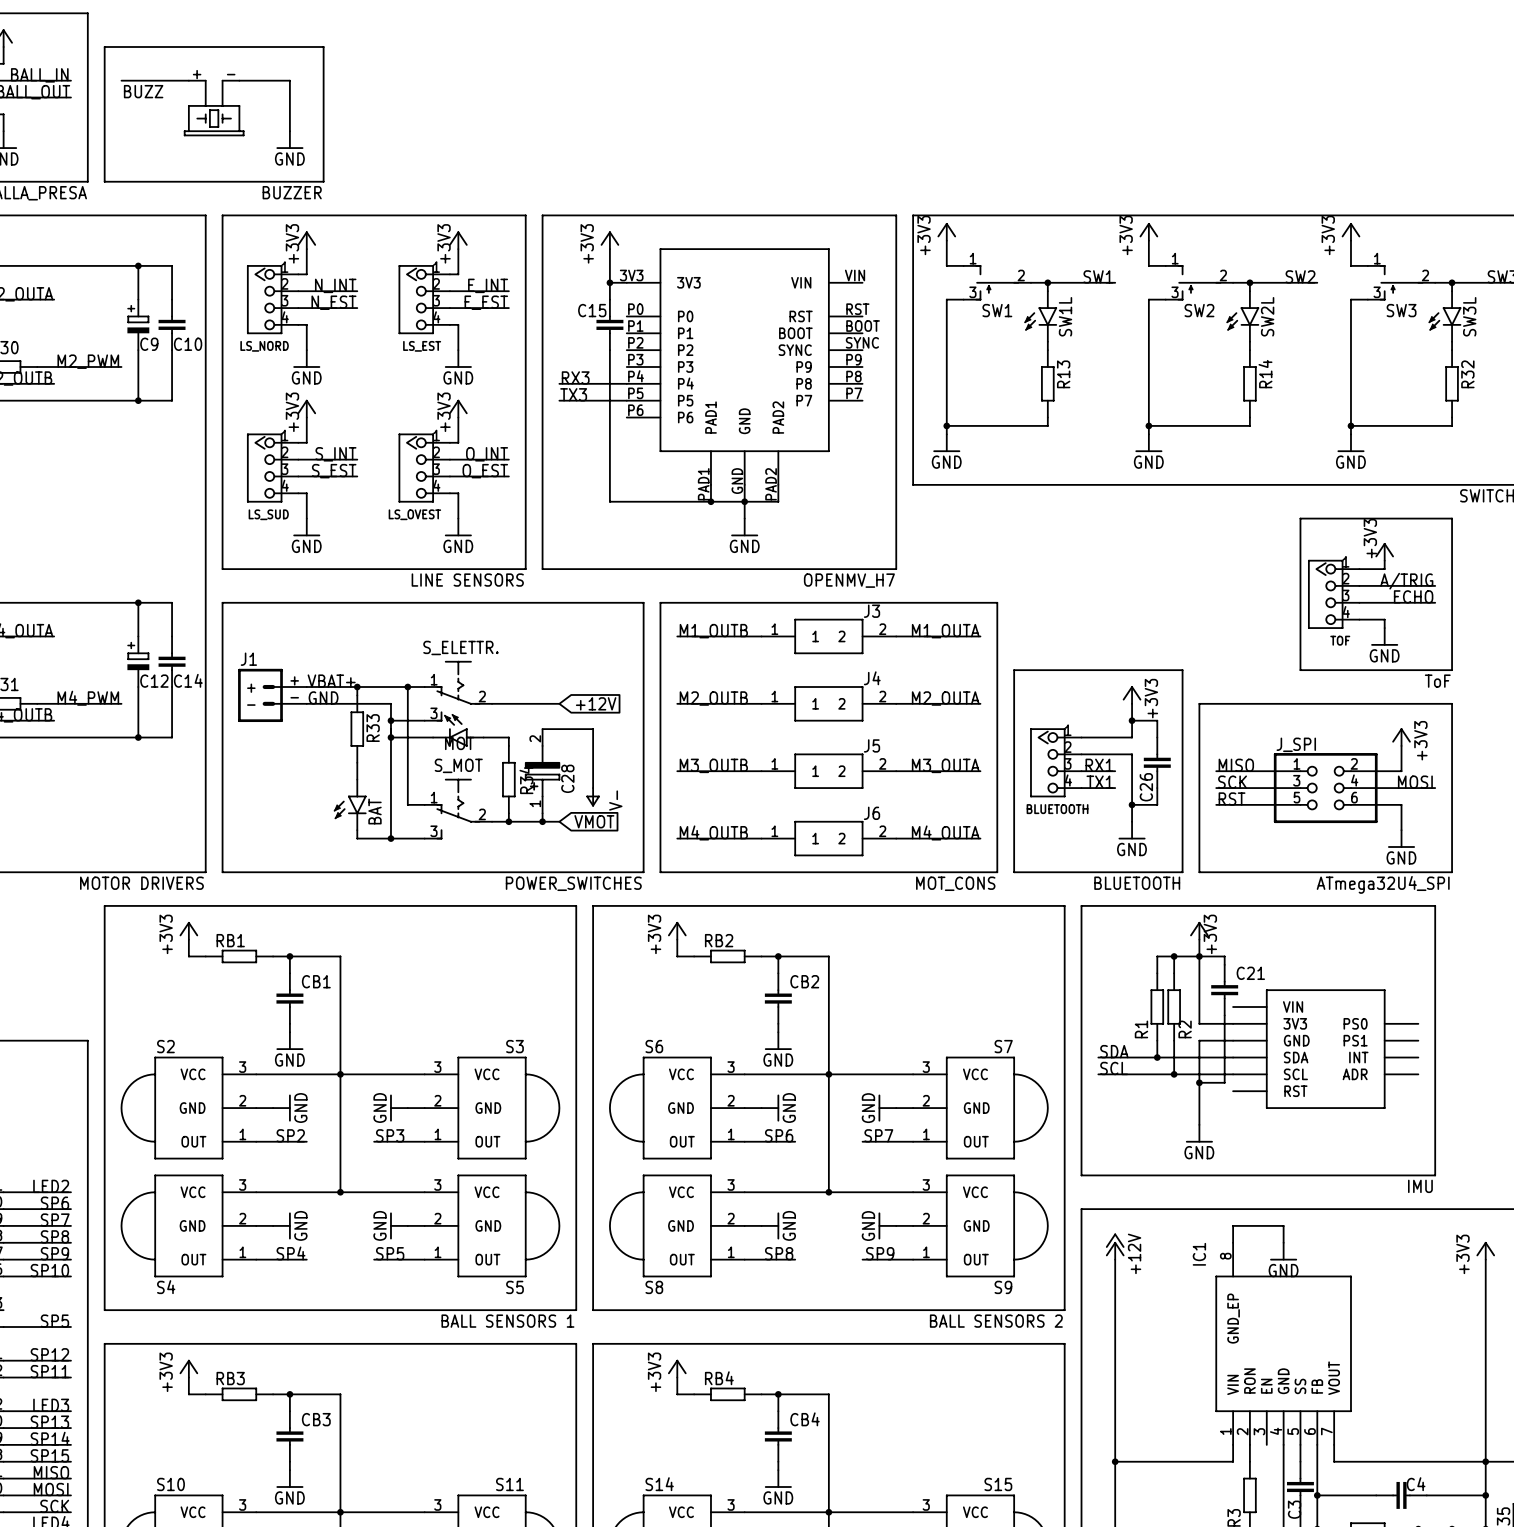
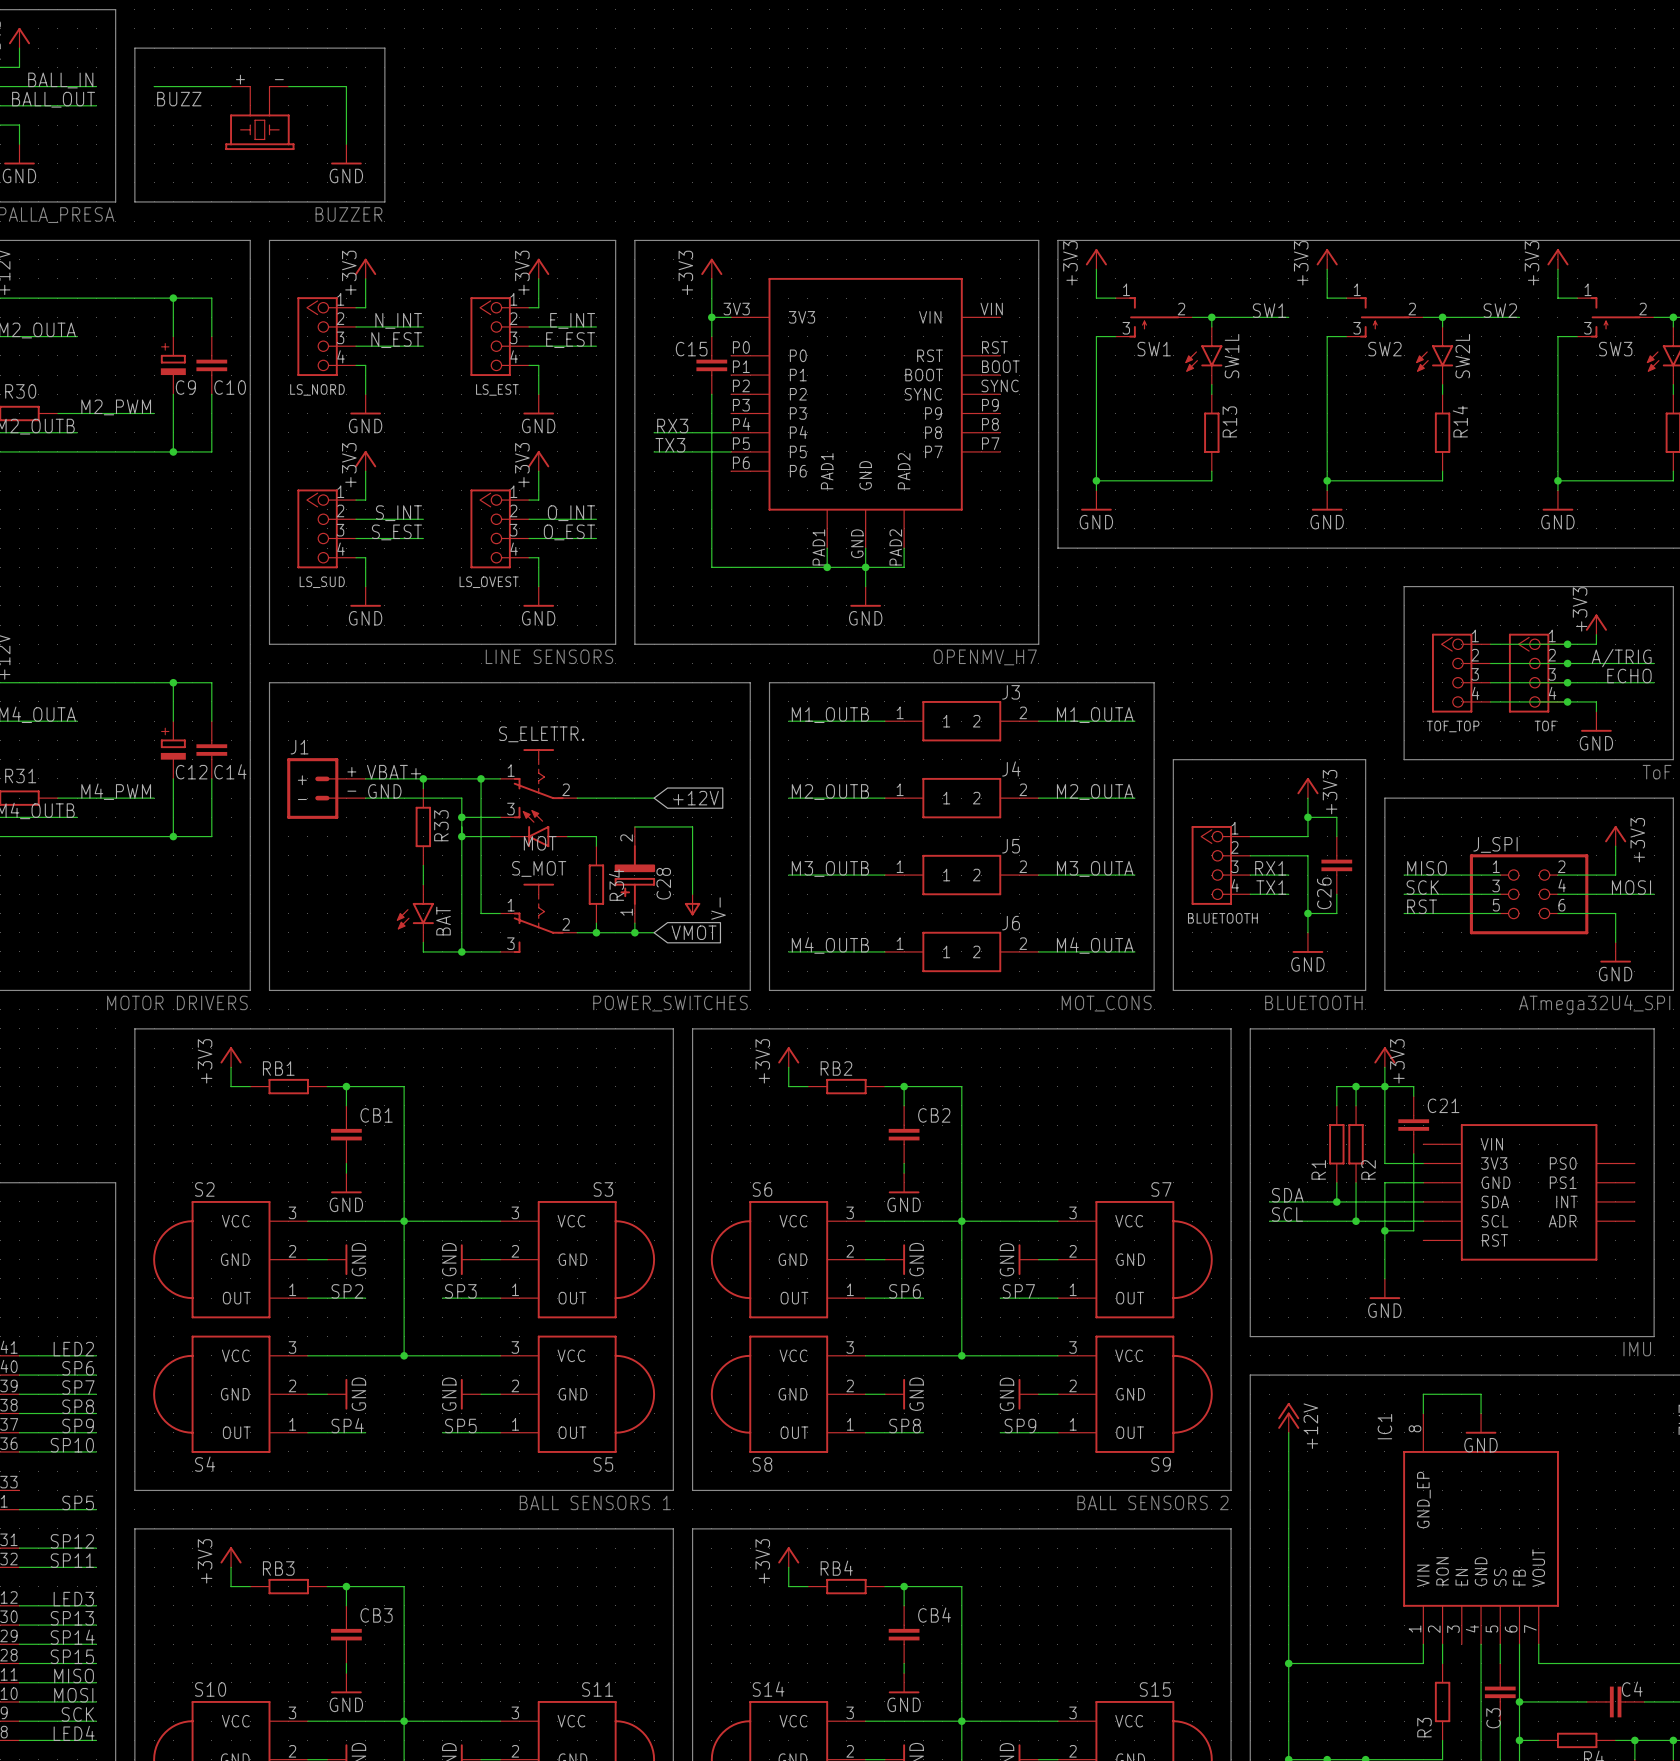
line: (1300, 518) (1300, 670) -> (1500, 586) (1404, 586) (1404, 759) (1500, 759)
wire: none -> (1490, 644) (1567, 644)
junction: none -> (1567, 644)
wire: none -> (1490, 663) (1567, 663)
junction: none -> (1567, 663)
TOF_TOP: none -> (1461, 673)
wire: none -> (1490, 682) (1567, 682)
junction: none -> (1567, 682)
wire: none -> (1490, 701) (1567, 701)
junction: none -> (1567, 701)

